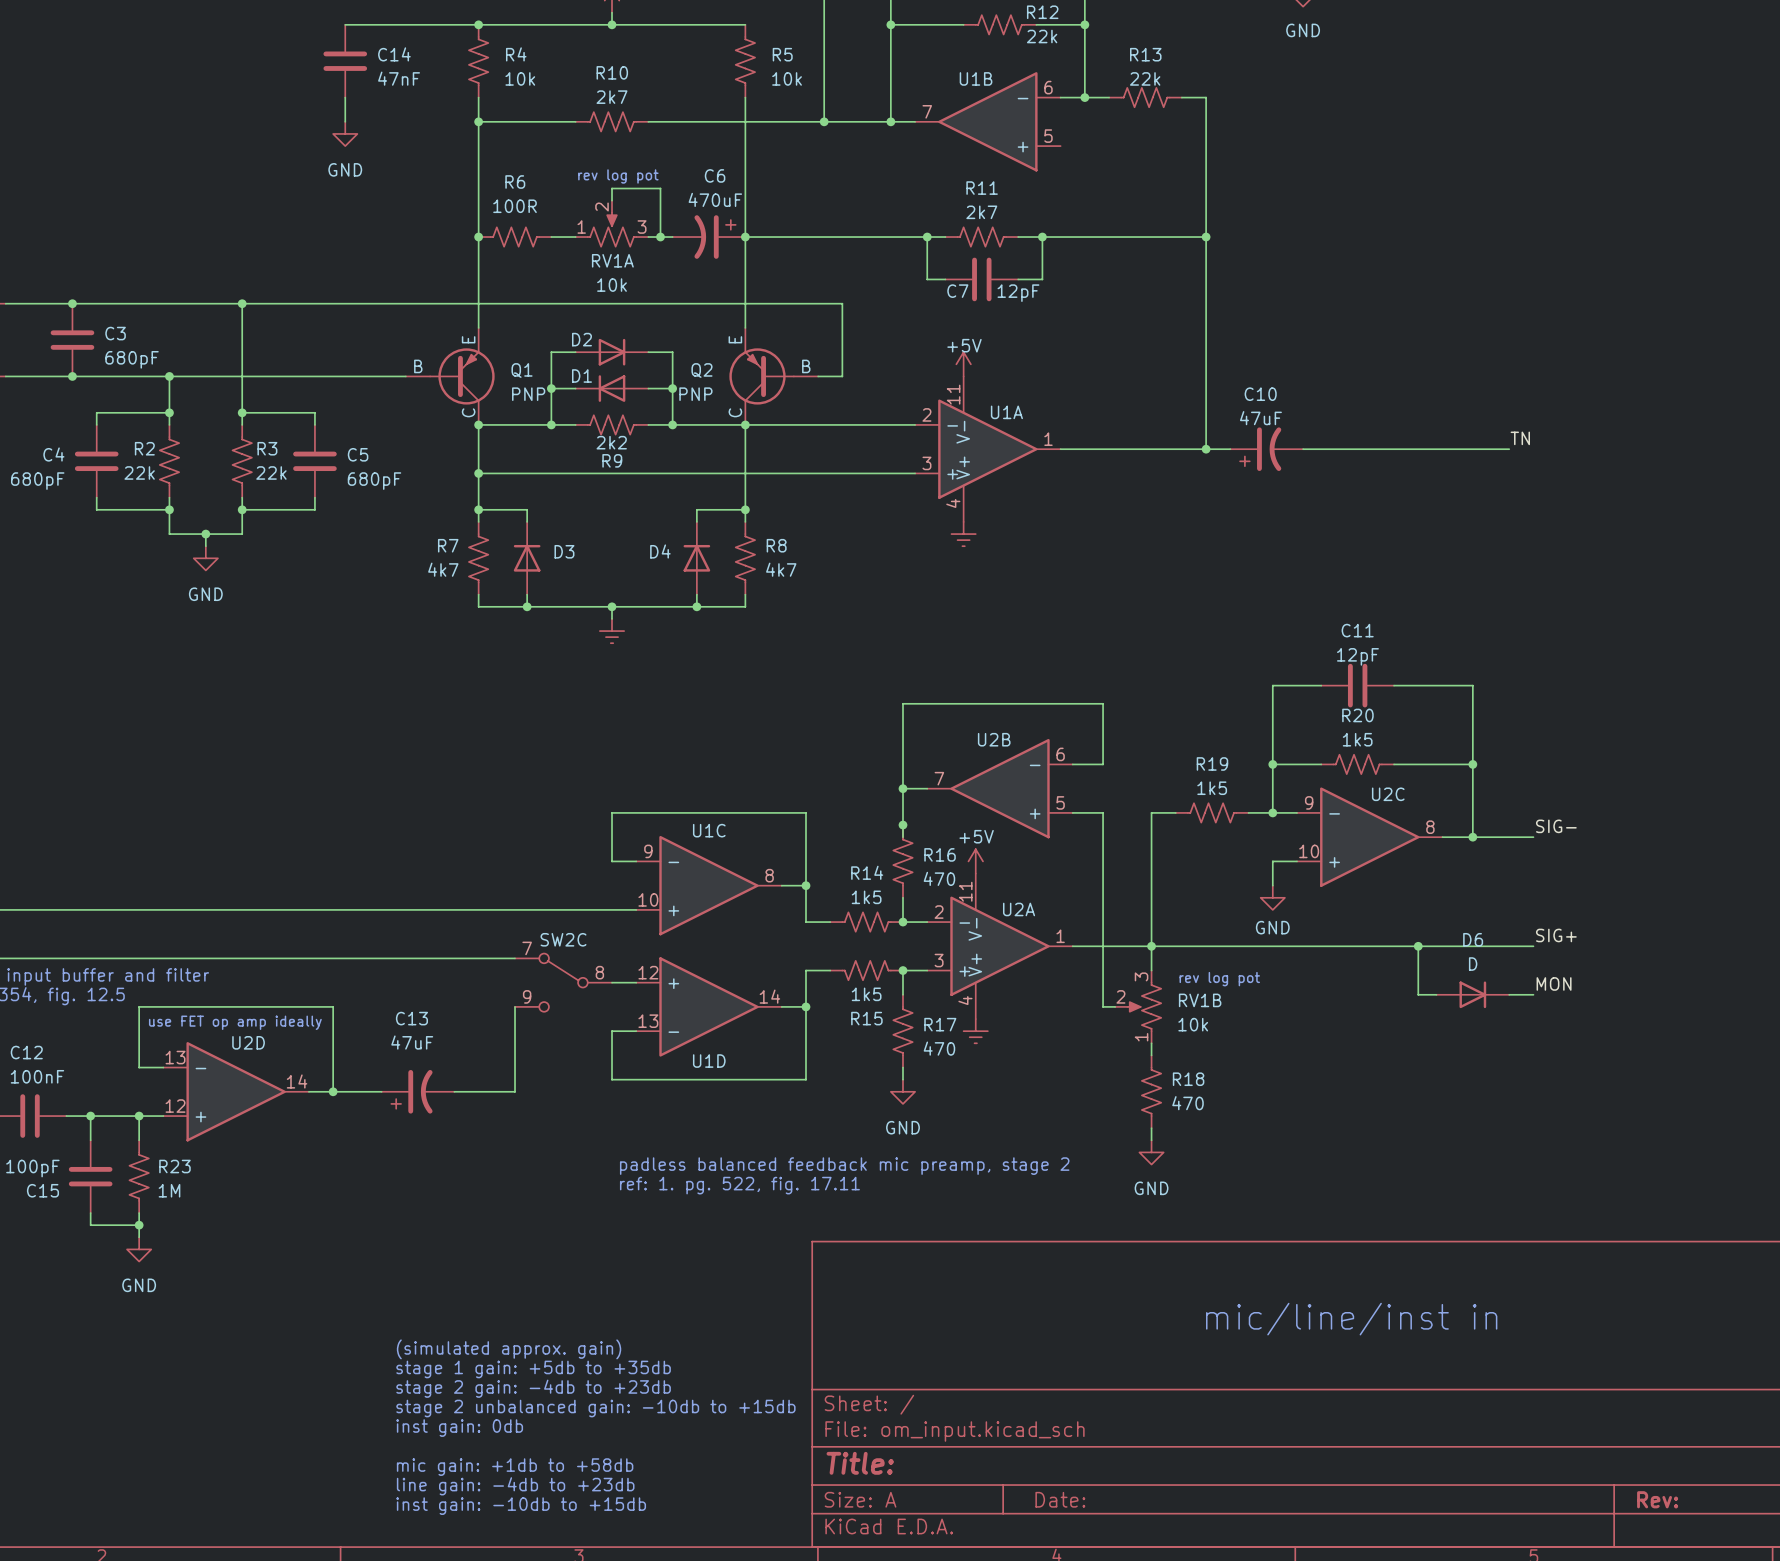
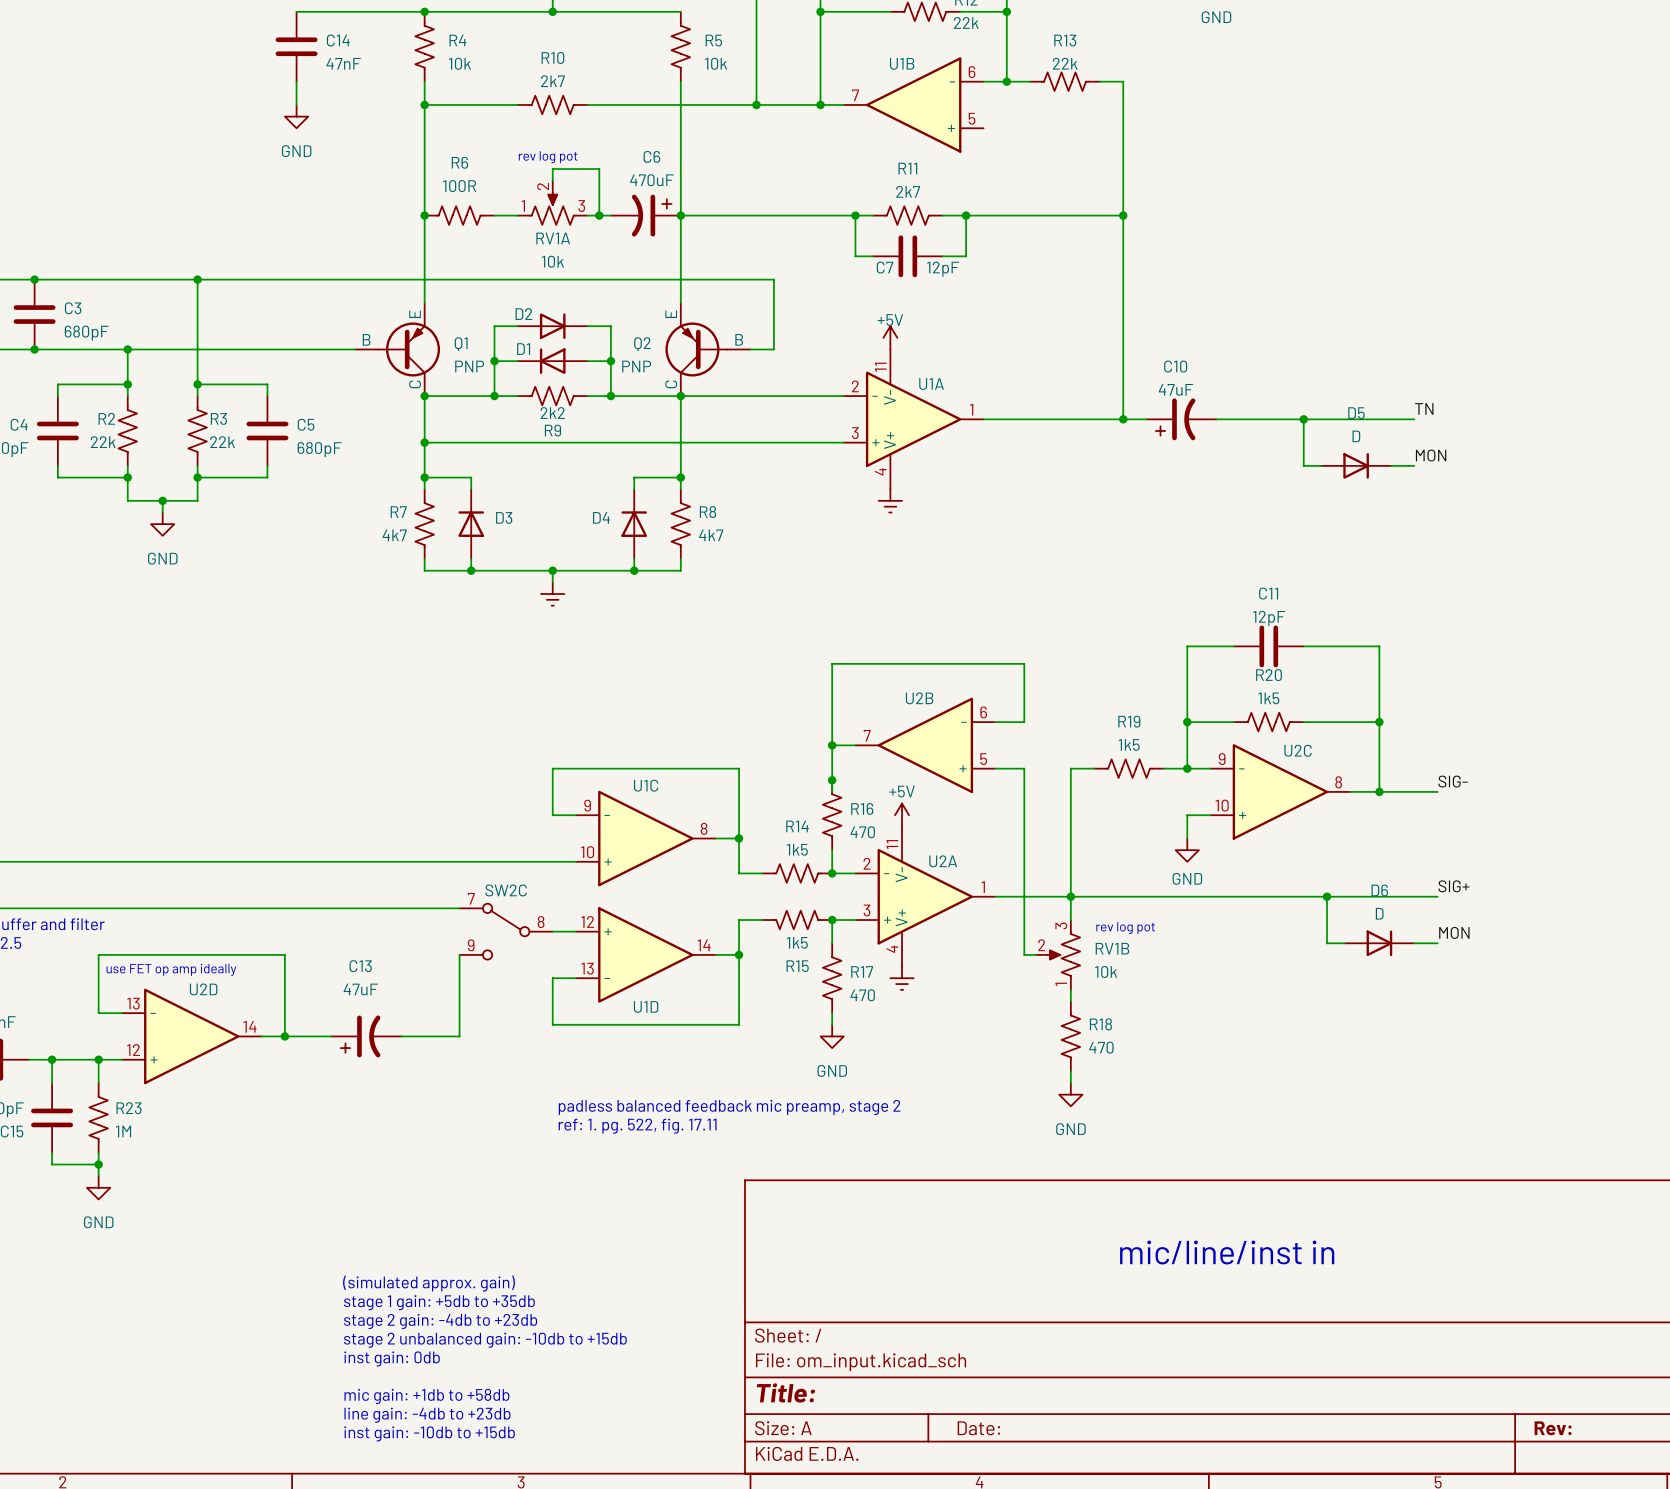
wire: none -> (1303, 419) (1303, 465) (1321, 465)
junction: none -> (1303, 419)
label: none -> MON (1431, 455)
D5: none -> D (1356, 465)
wire: none -> (1391, 465) (1414, 465)

